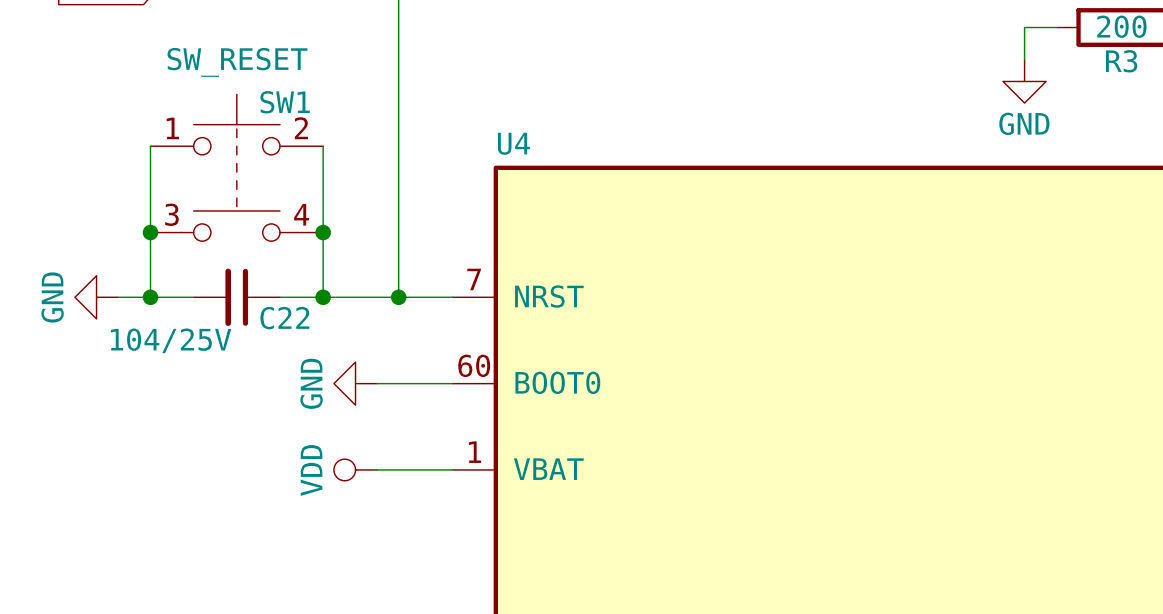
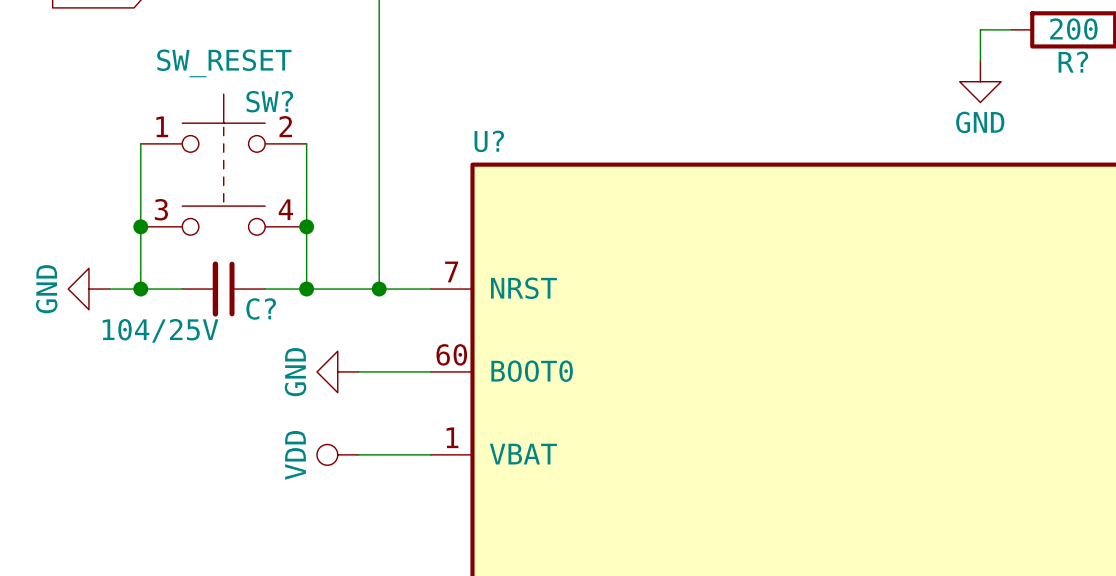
R3 name: R3 (1121, 61) -> R? (1073, 62)
SW1 name: SW1 (285, 102) -> SW? (269, 101)
U4 name: U4 (513, 143) -> U? (489, 141)
C22 name: C22 (284, 318) -> C? (261, 308)

